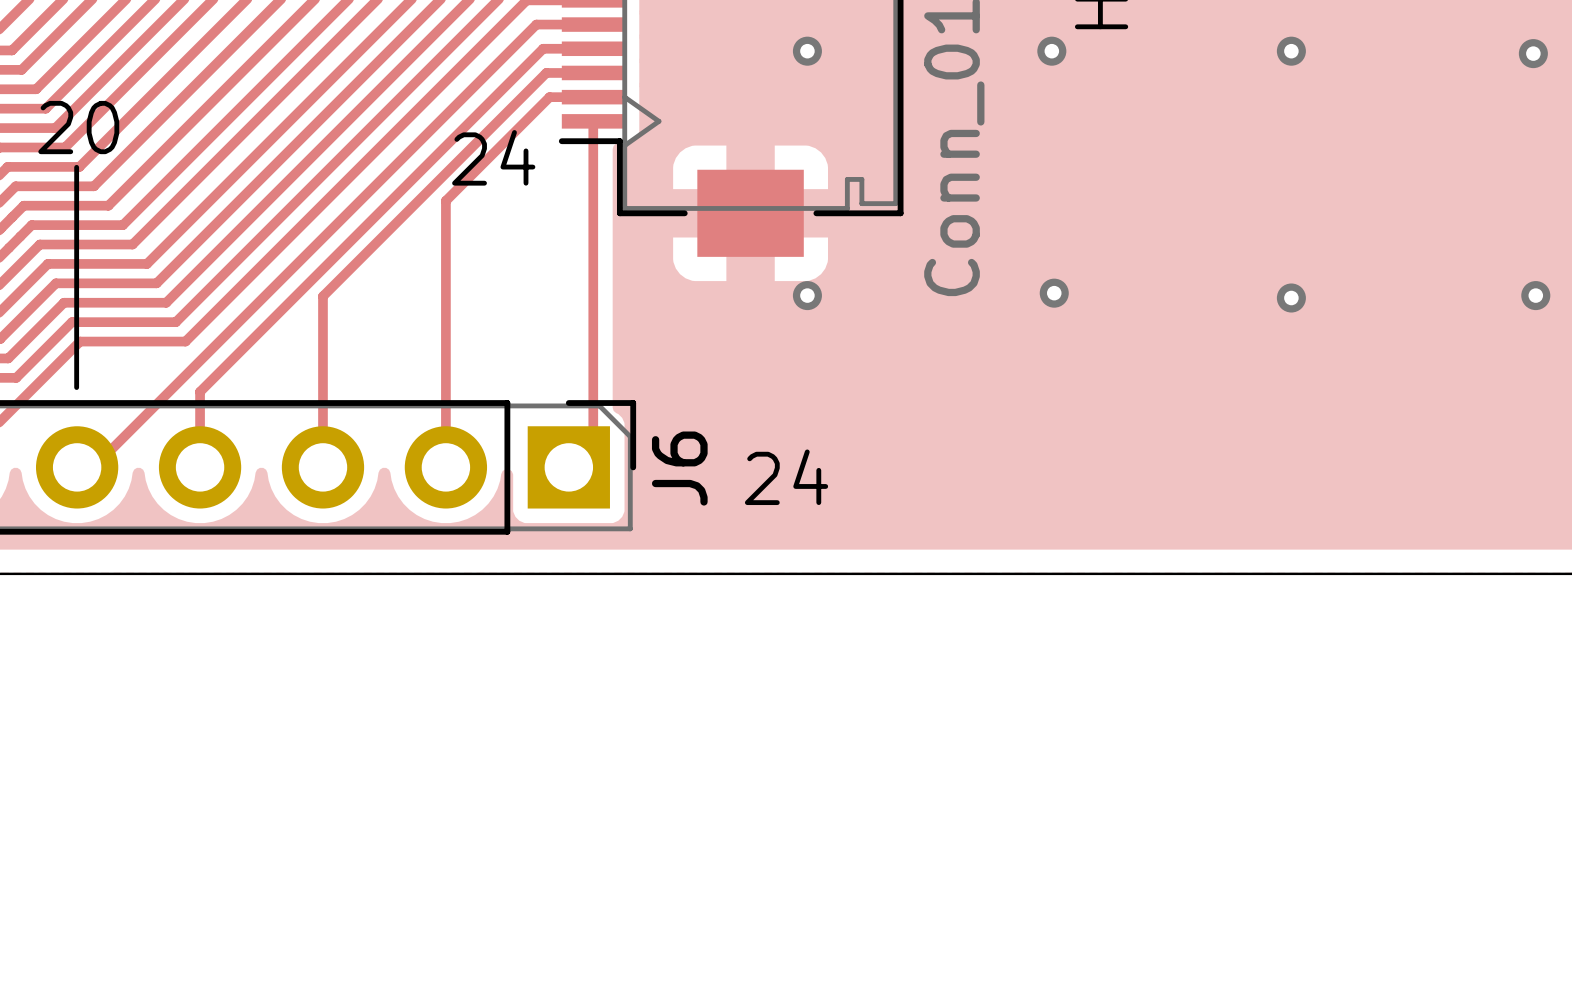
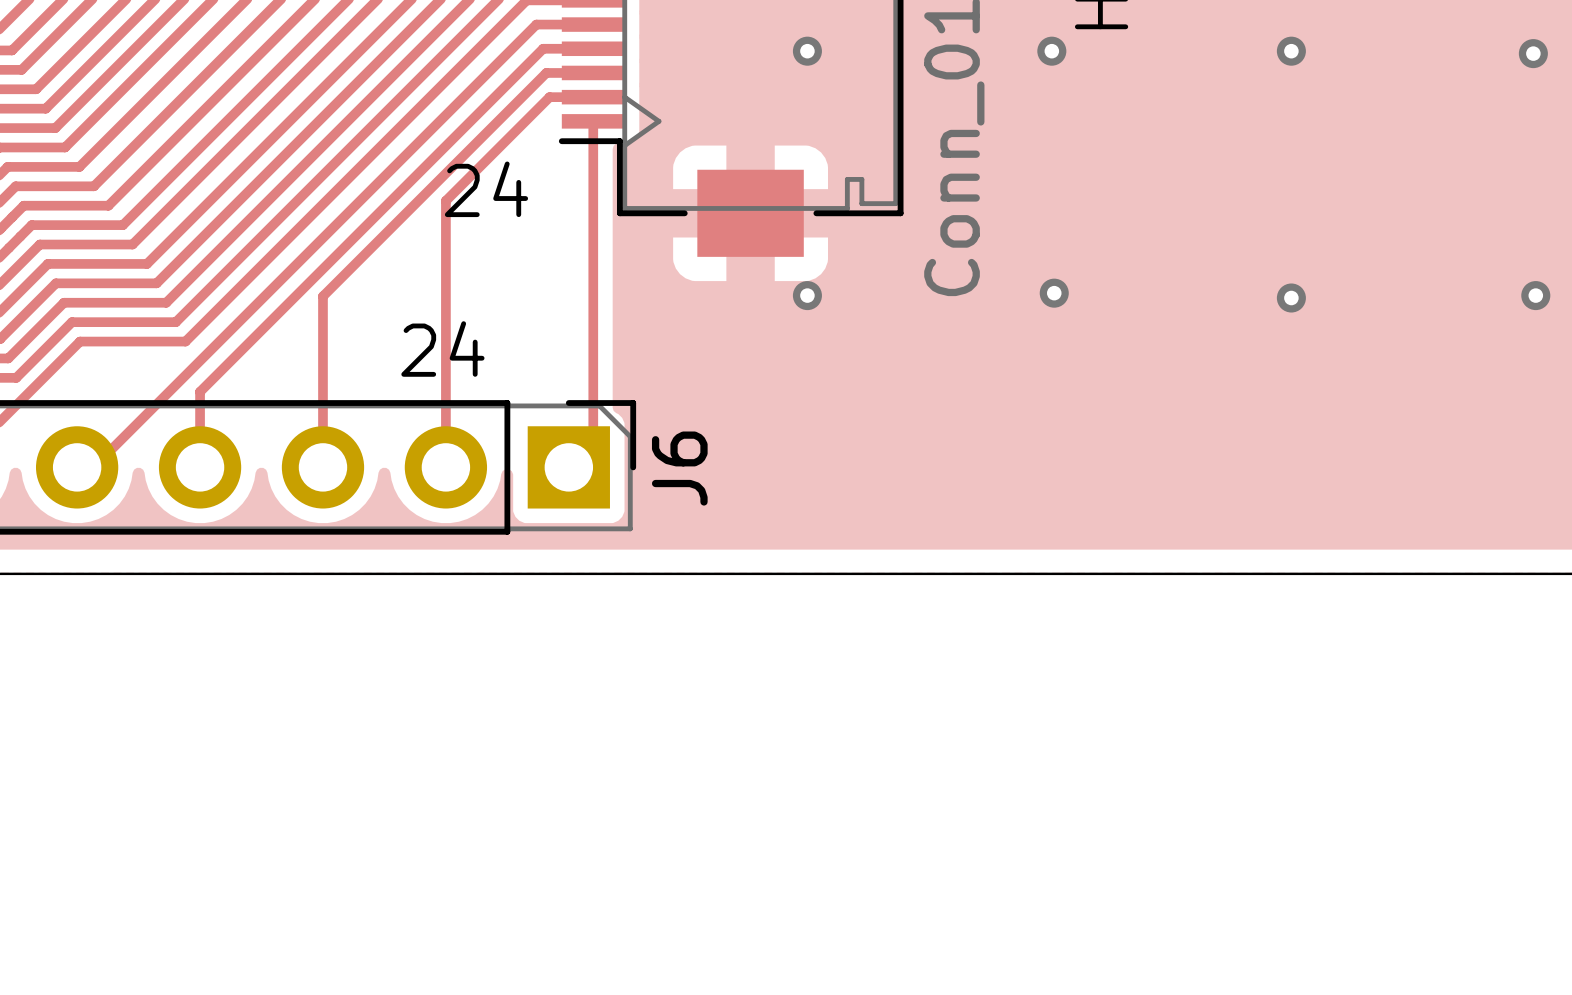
text: 20 (78, 127) -> none
text position: 24 (493, 157) -> 24 (486, 189)
line: (76, 167) (76, 387) -> none
text position: 24 (786, 477) -> 24 (442, 349)

